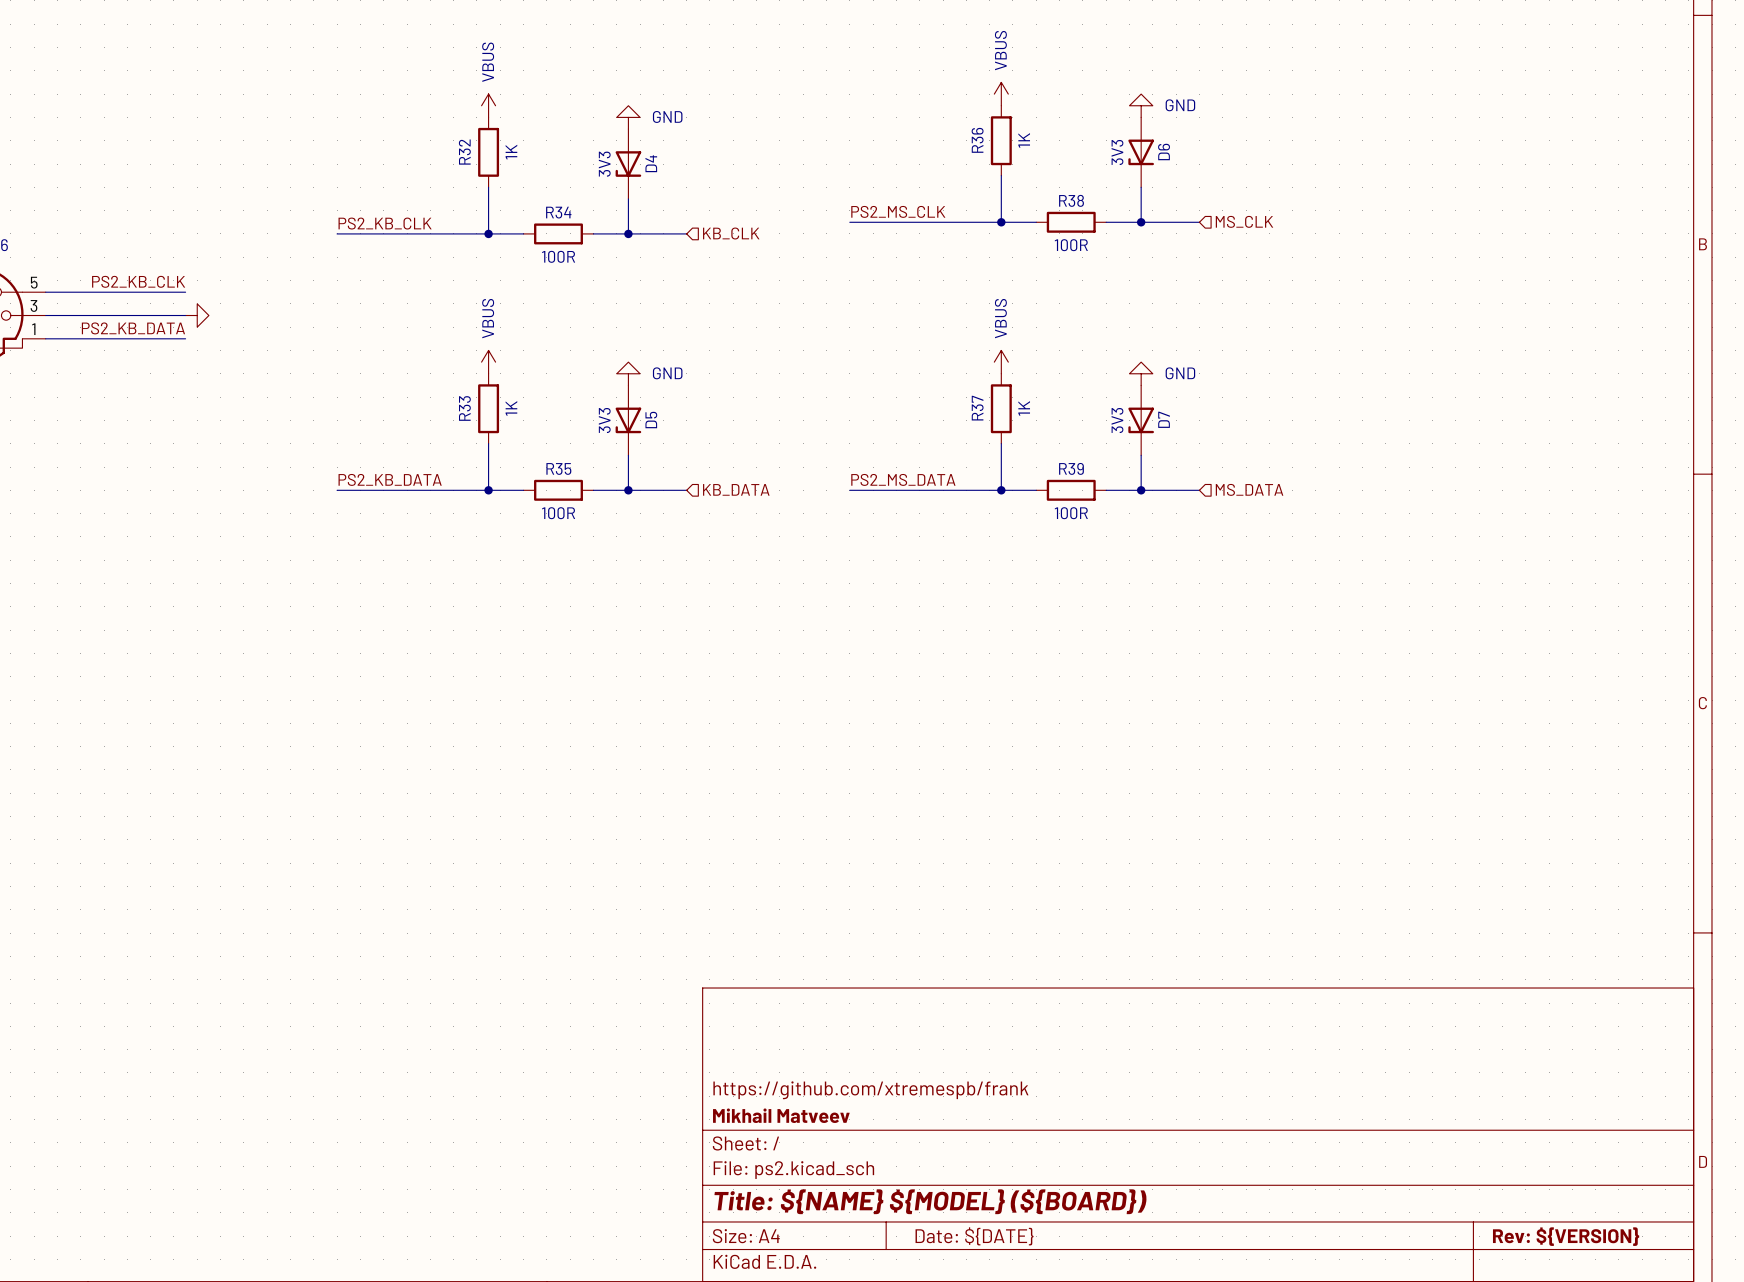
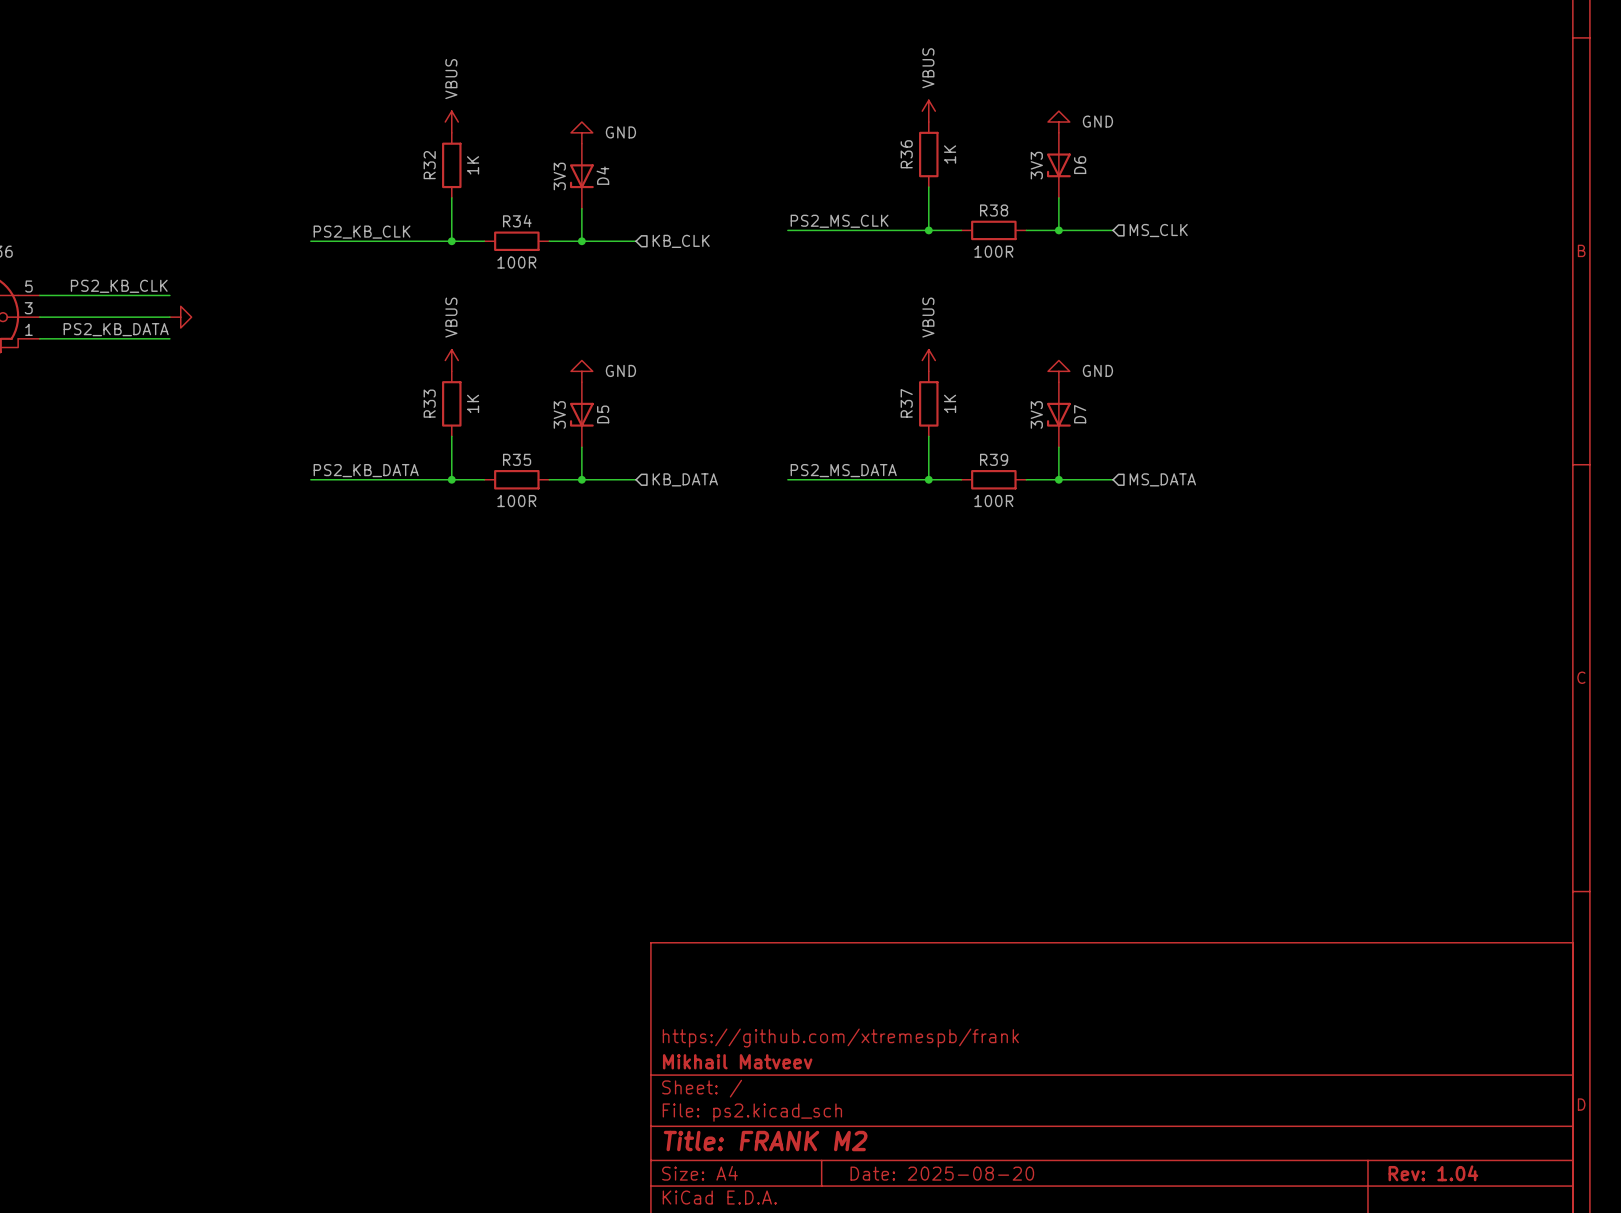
title block: Title: ${NAME} ${MODEL} (${BOARD}) (930, 1201) -> Title: FRANK M2 (765, 1141)
title block: Date: ${DATE} (974, 1236) -> Date: 2025-08-20 (942, 1173)
title block: Rev: ${VERSION} (1566, 1236) -> Rev: 1.04 (1433, 1173)

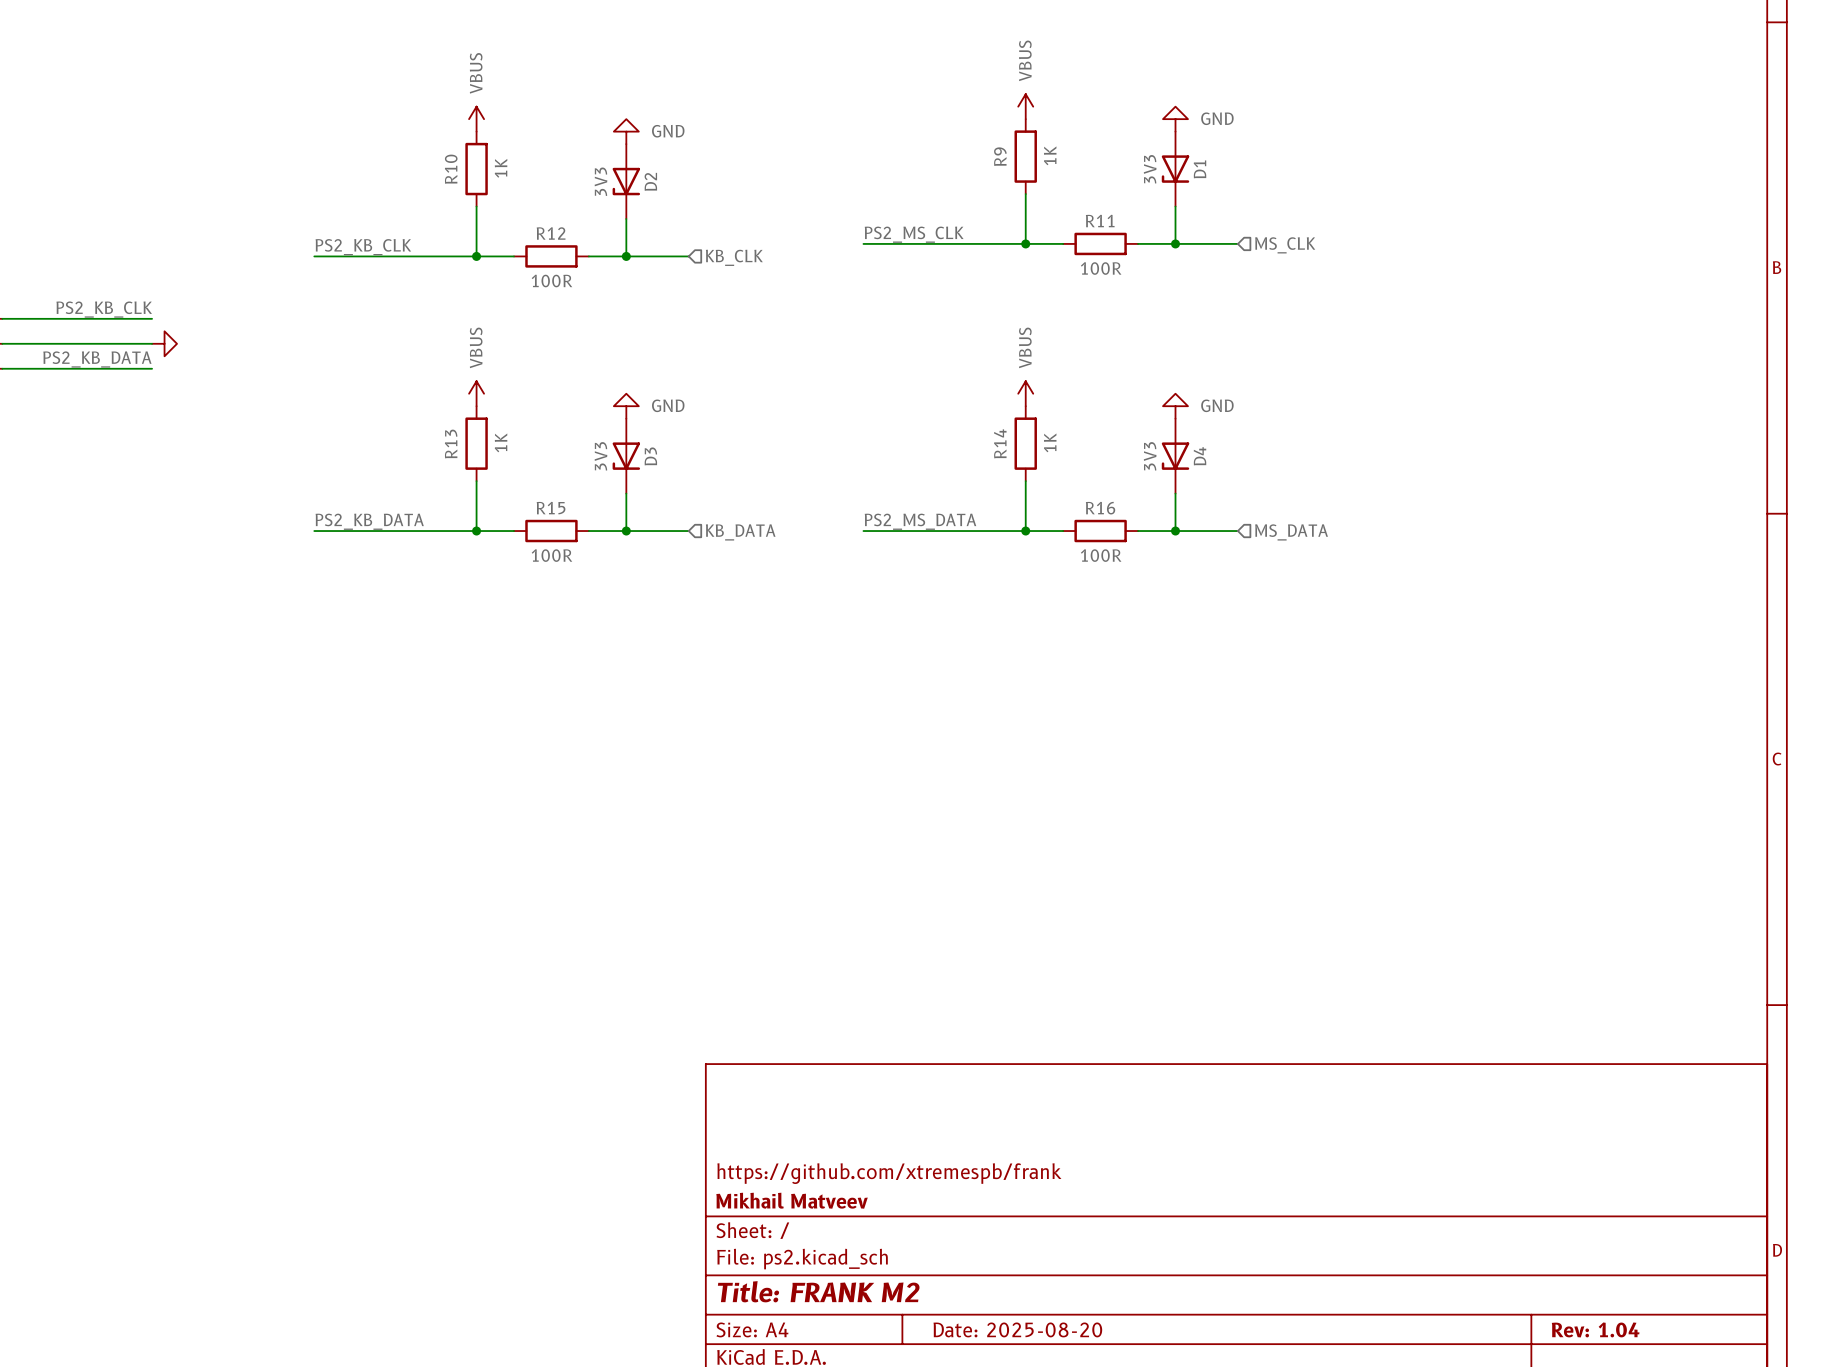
R36 name: R36 (906, 154) -> R9 (1000, 156)
R32 name: R32 (429, 165) -> R10 (451, 169)
D6 name: D6 (1080, 165) -> D1 (1199, 169)
D4 name: D4 (602, 175) -> D2 (650, 181)
R38 name: R38 (994, 210) -> R11 (1100, 221)
R34 name: R34 (517, 221) -> R12 (551, 233)
R33 name: R33 (429, 403) -> R13 (451, 444)
R37 name: R37 (906, 403) -> R14 (1000, 443)
D5 name: D5 (603, 414) -> D3 (650, 456)
D7 name: D7 (1080, 414) -> D4 (1199, 456)
R35 name: R35 (517, 459) -> R15 (551, 508)
R39 name: R39 (994, 459) -> R16 (1100, 508)

